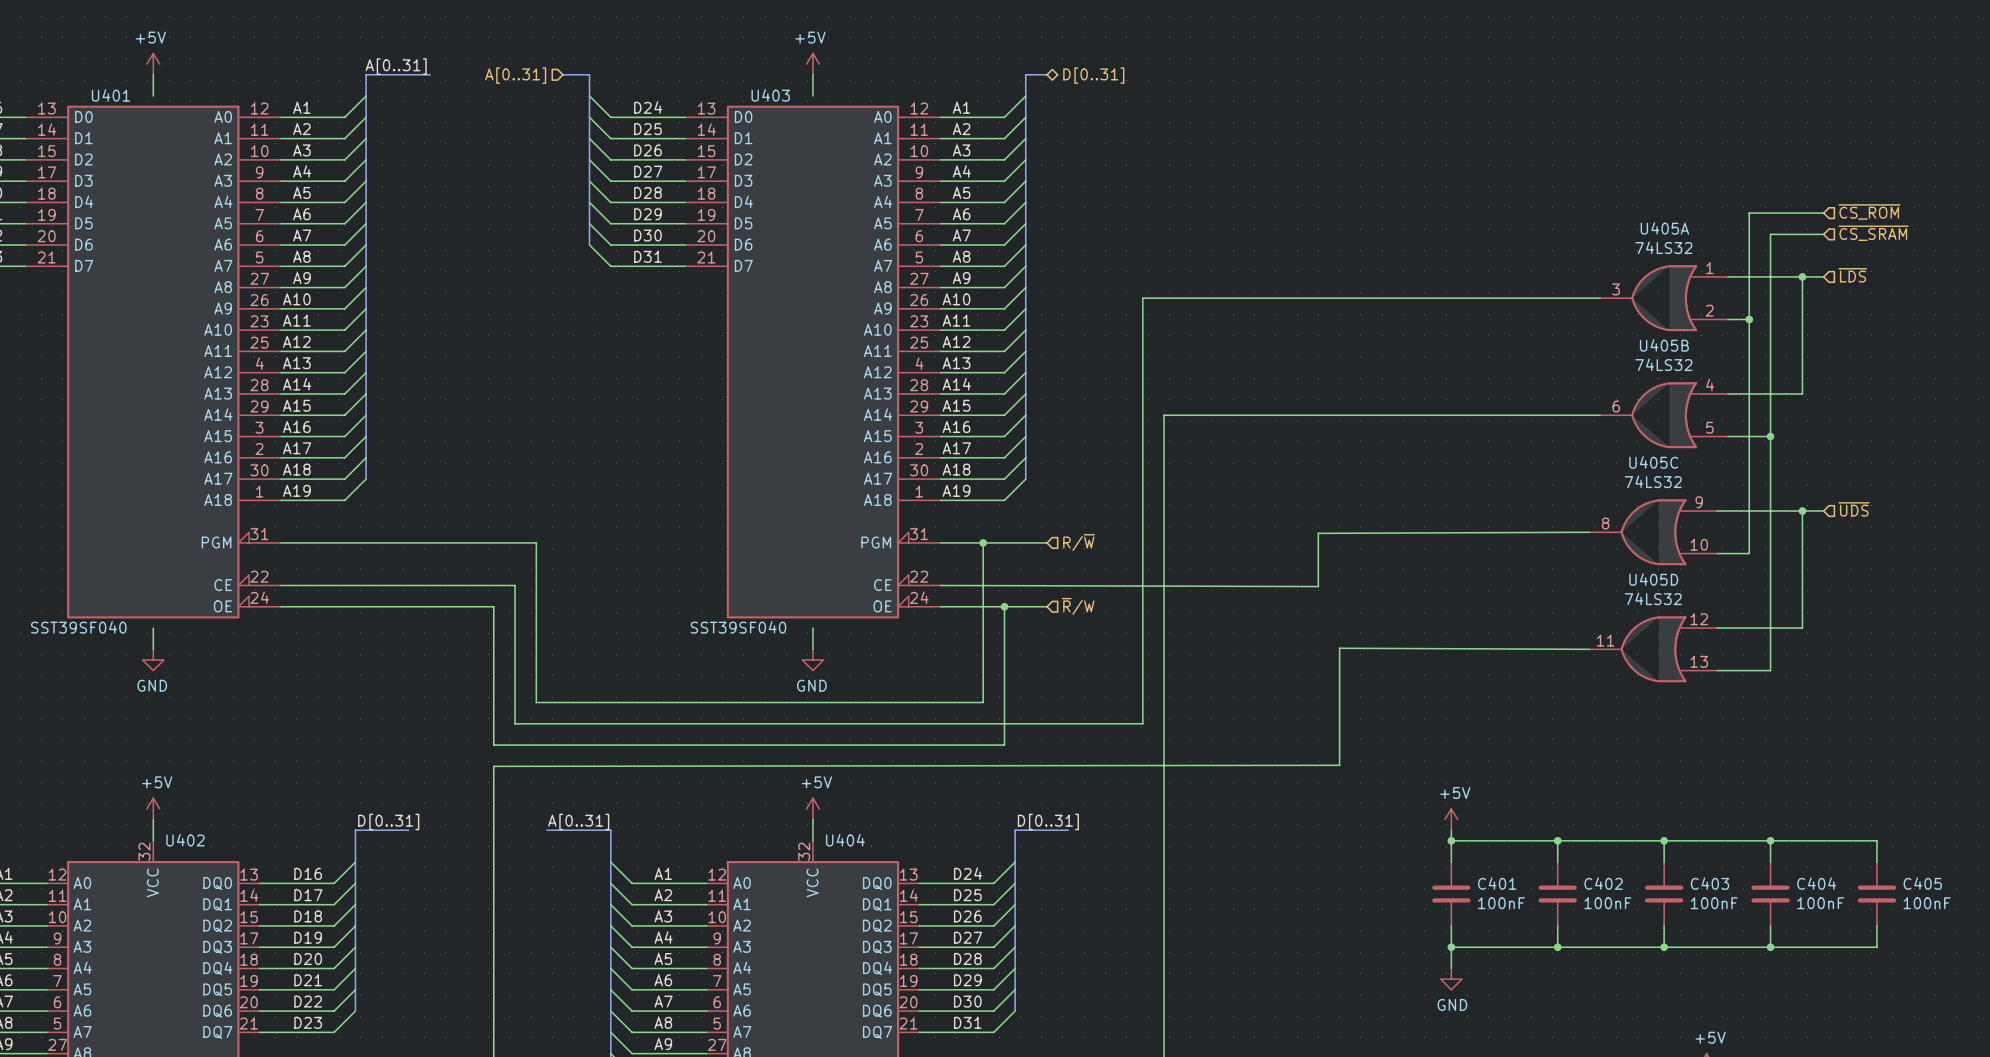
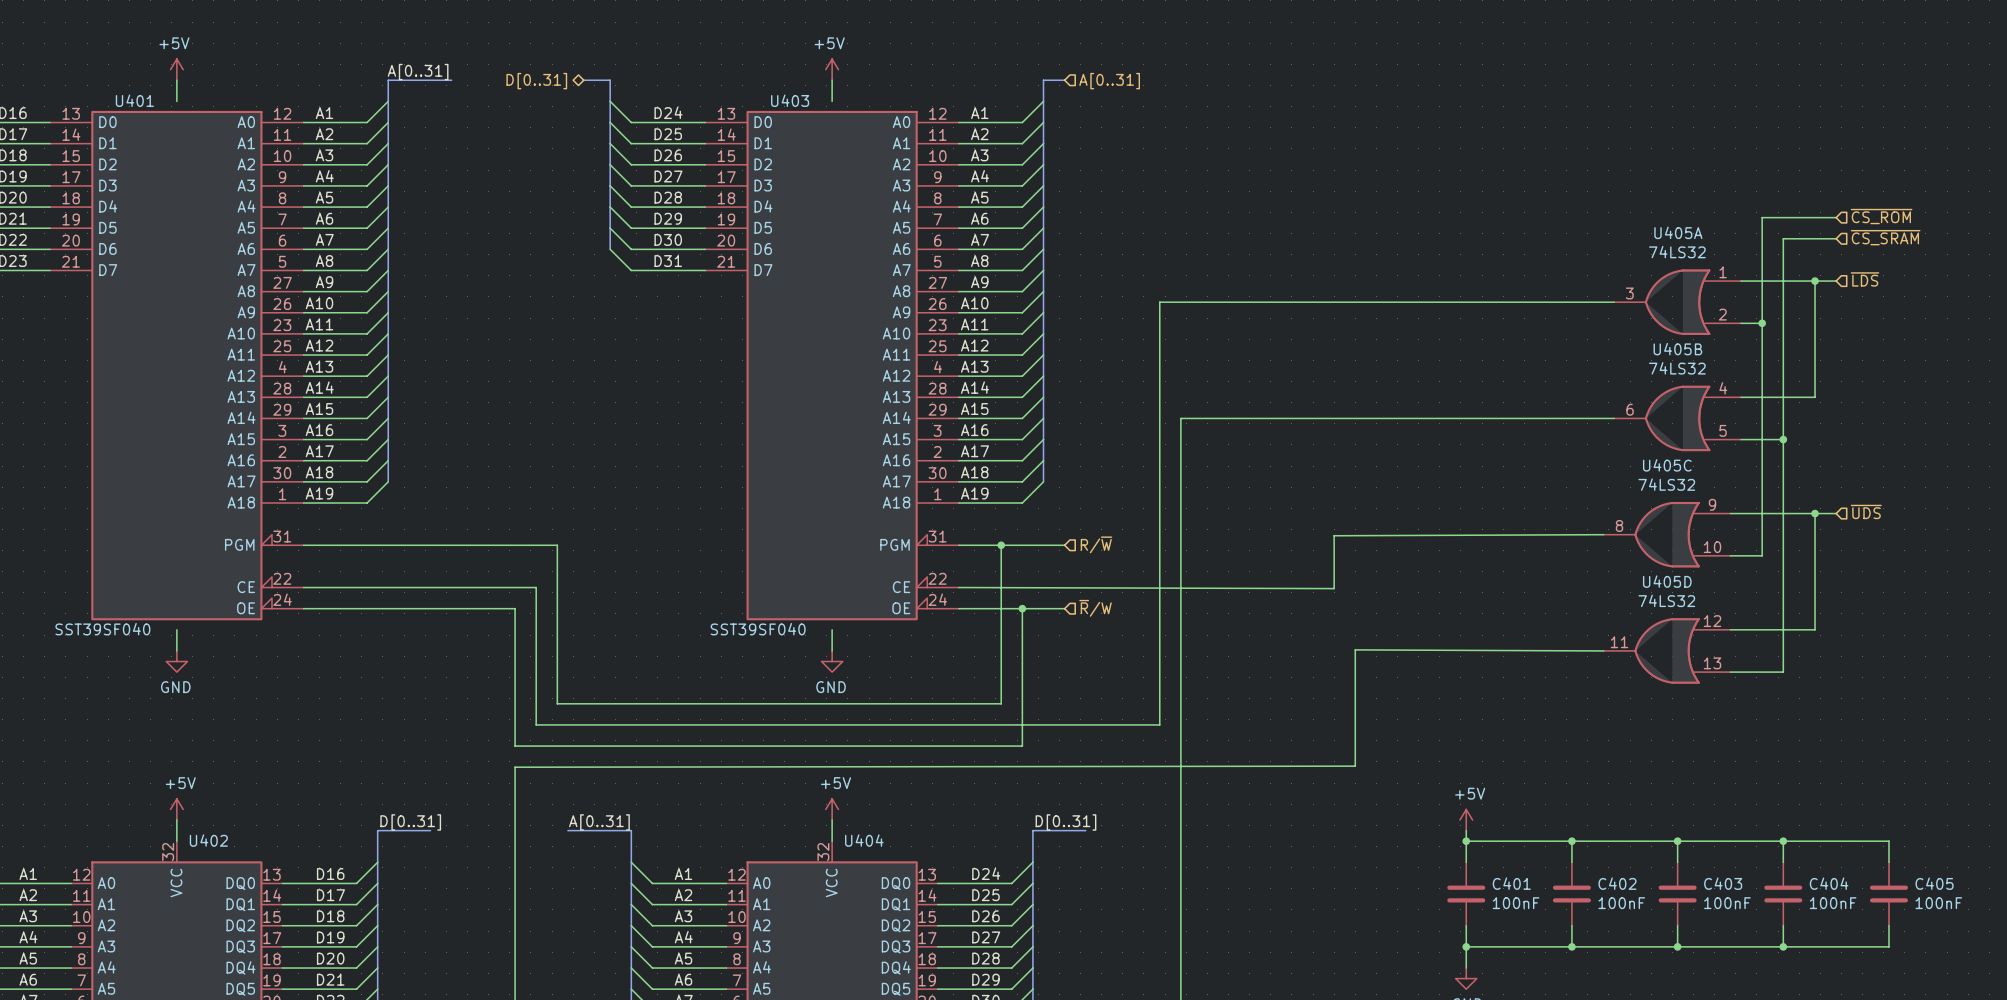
hierarchical label shape: input (515, 75) -> bidirectional (536, 81)
hierarchical label: A[0..31] (515, 75) -> D[0..31] (536, 81)
hierarchical label shape: bidirectional (1093, 75) -> input (1109, 81)
hierarchical label: D[0..31] (1093, 75) -> A[0..31] (1109, 81)

